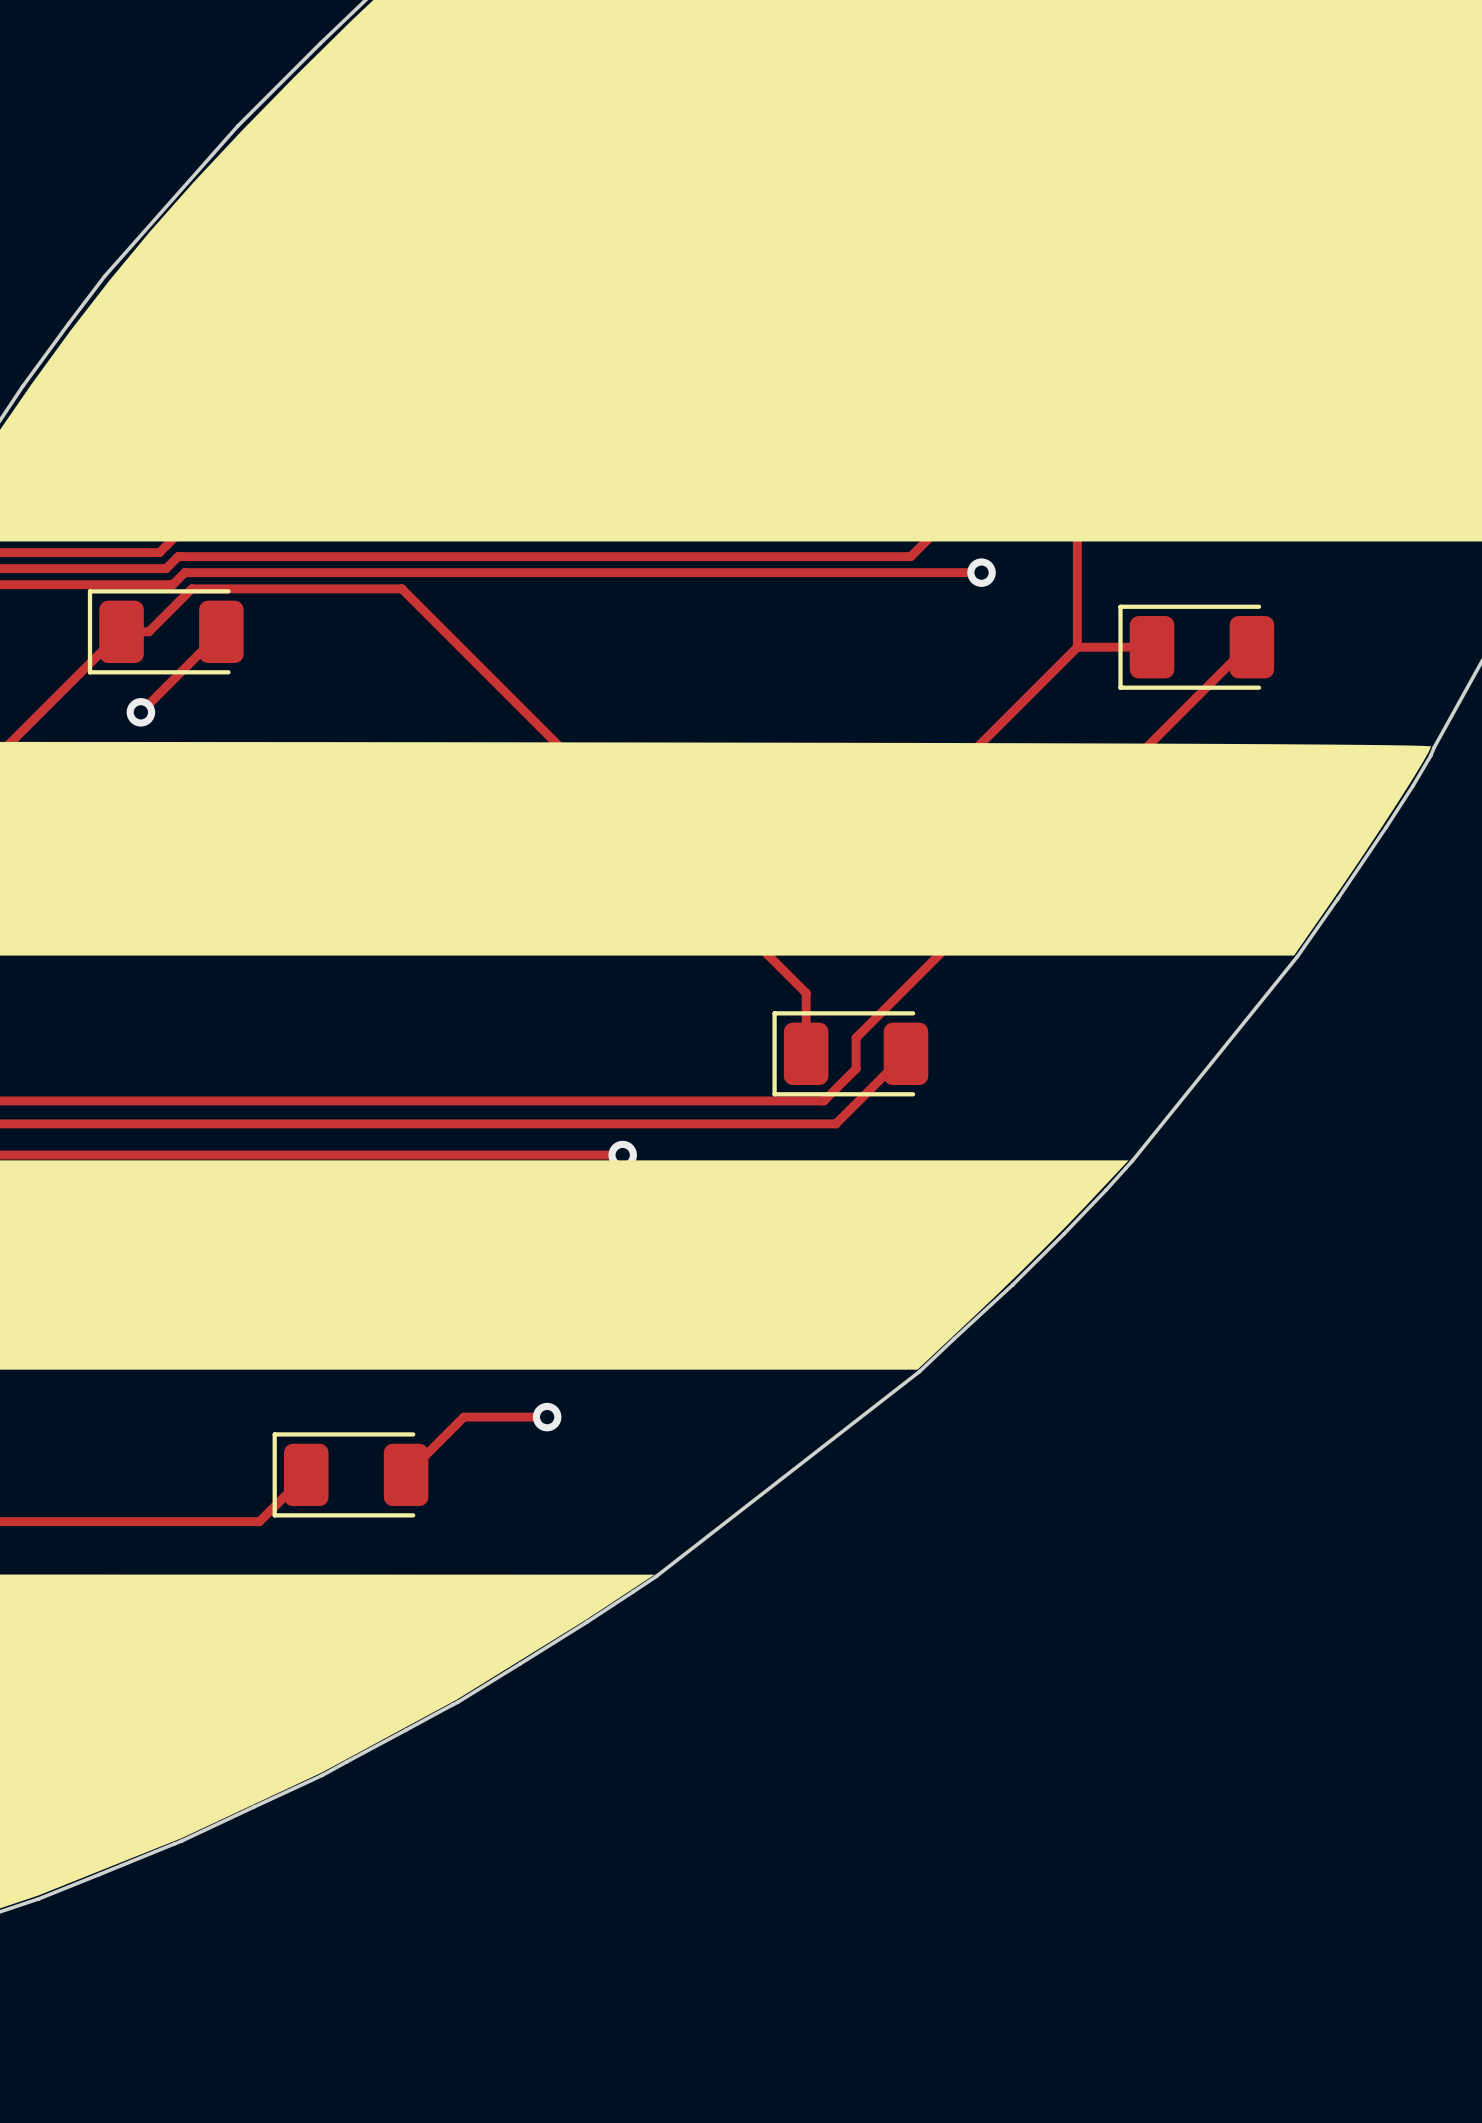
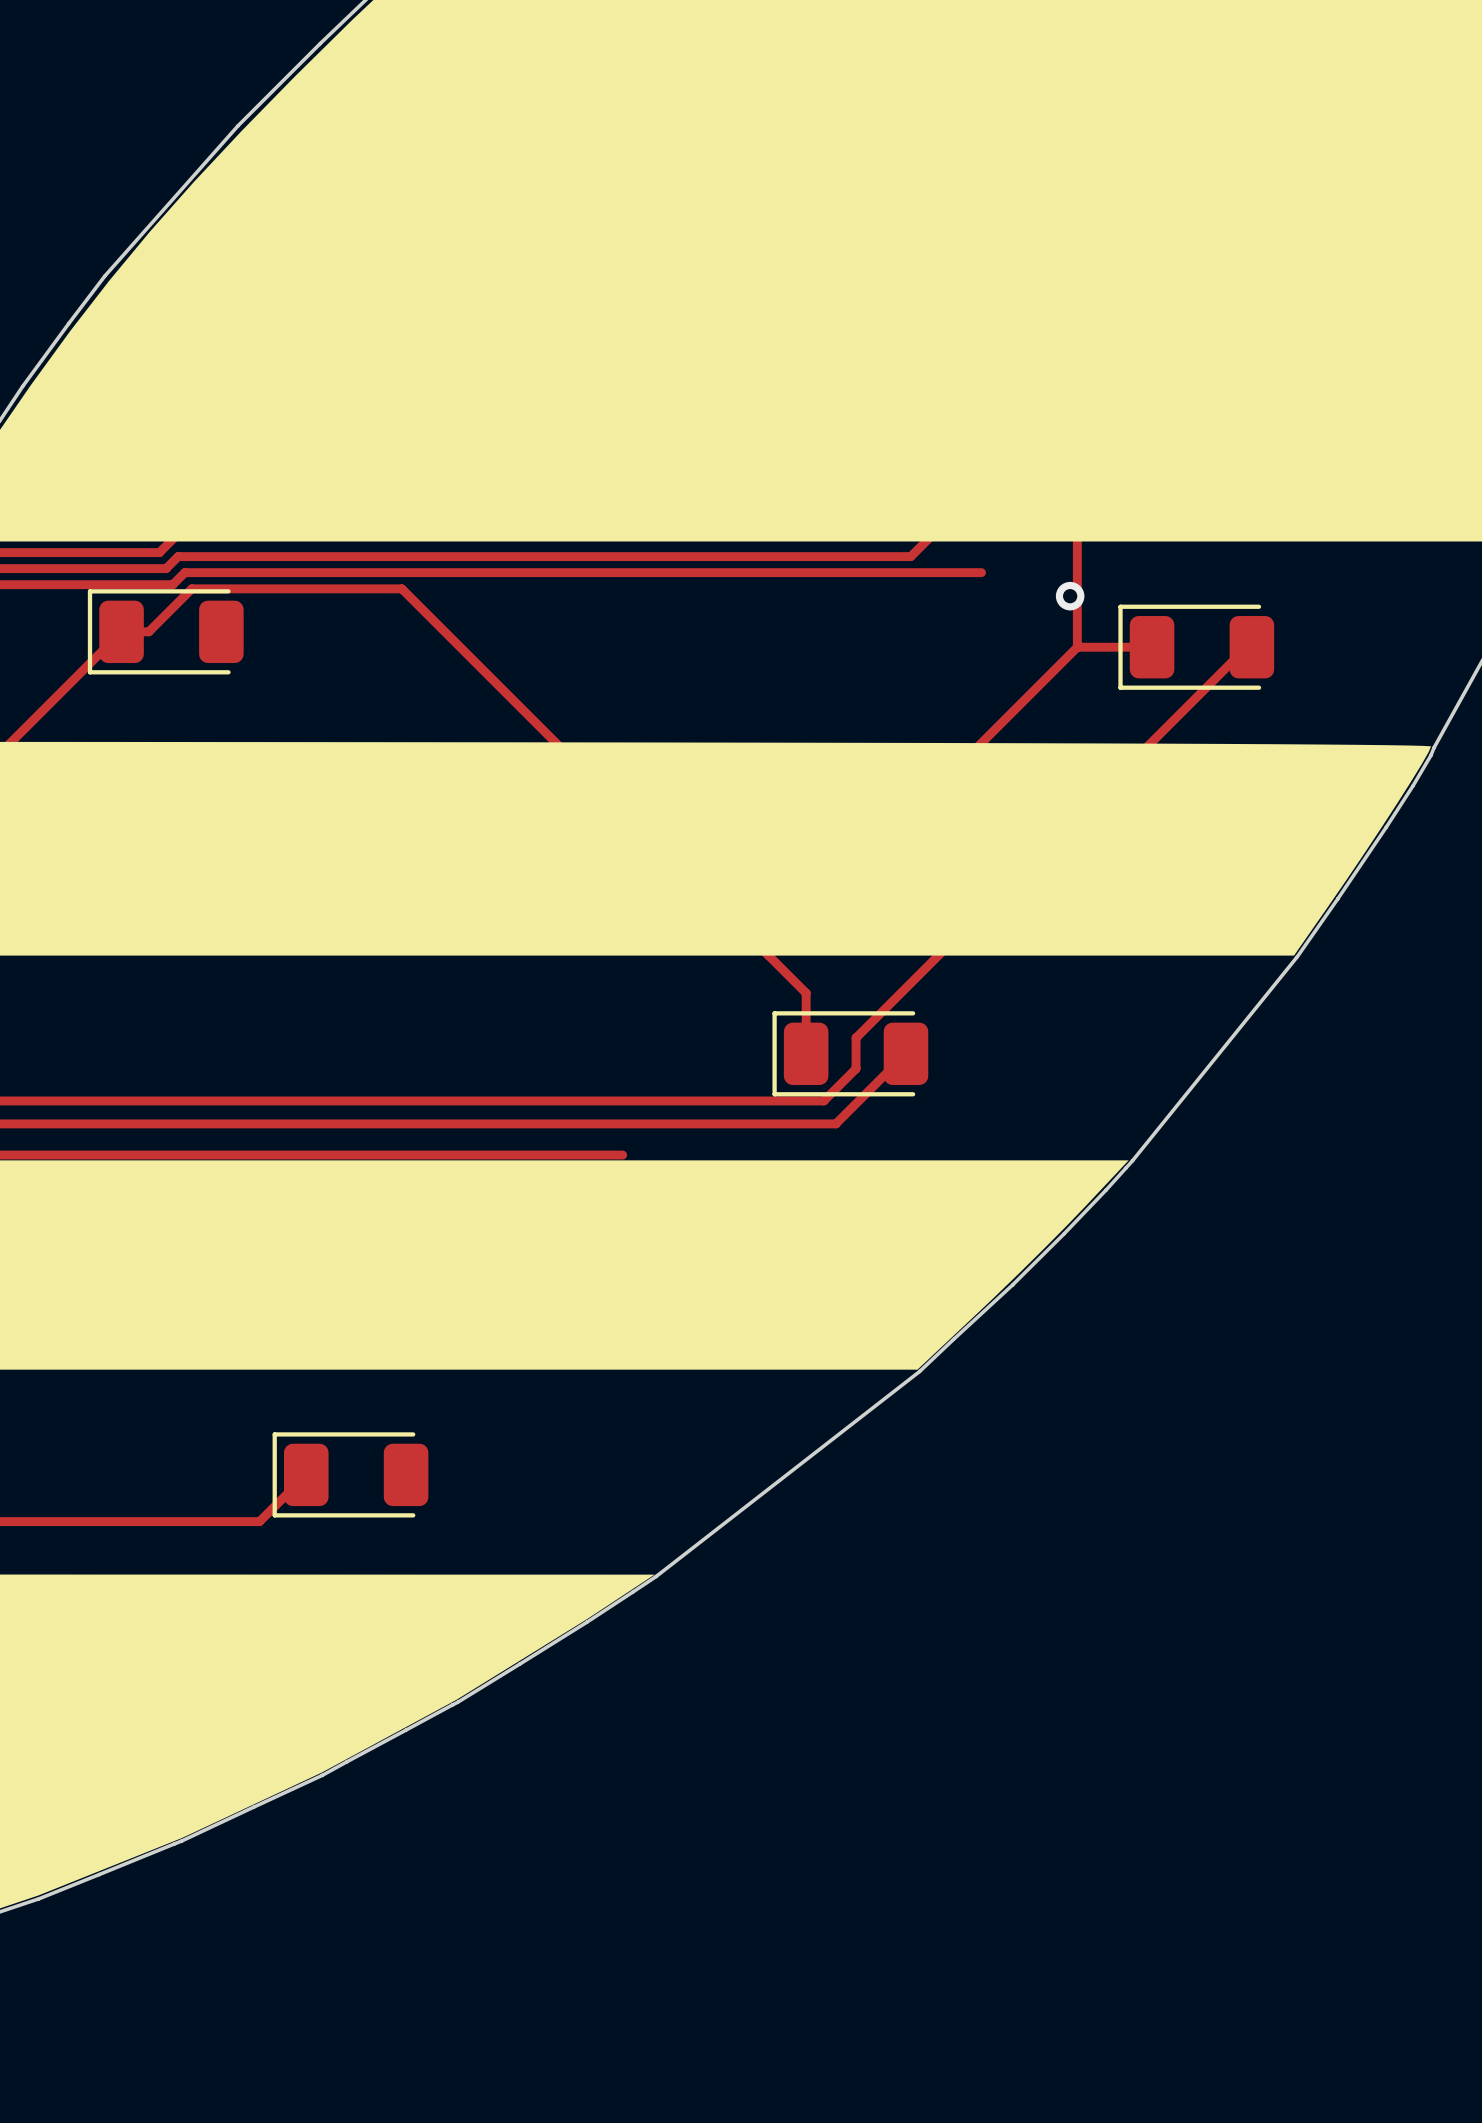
via: (981, 572) -> none
via: none -> (1070, 596)
track: (221, 631) (140, 712) -> none
via: (140, 712) -> none
via: (622, 1155) -> none
track: (547, 1417) (463, 1417) (406, 1474) -> none
via: (547, 1417) -> none

